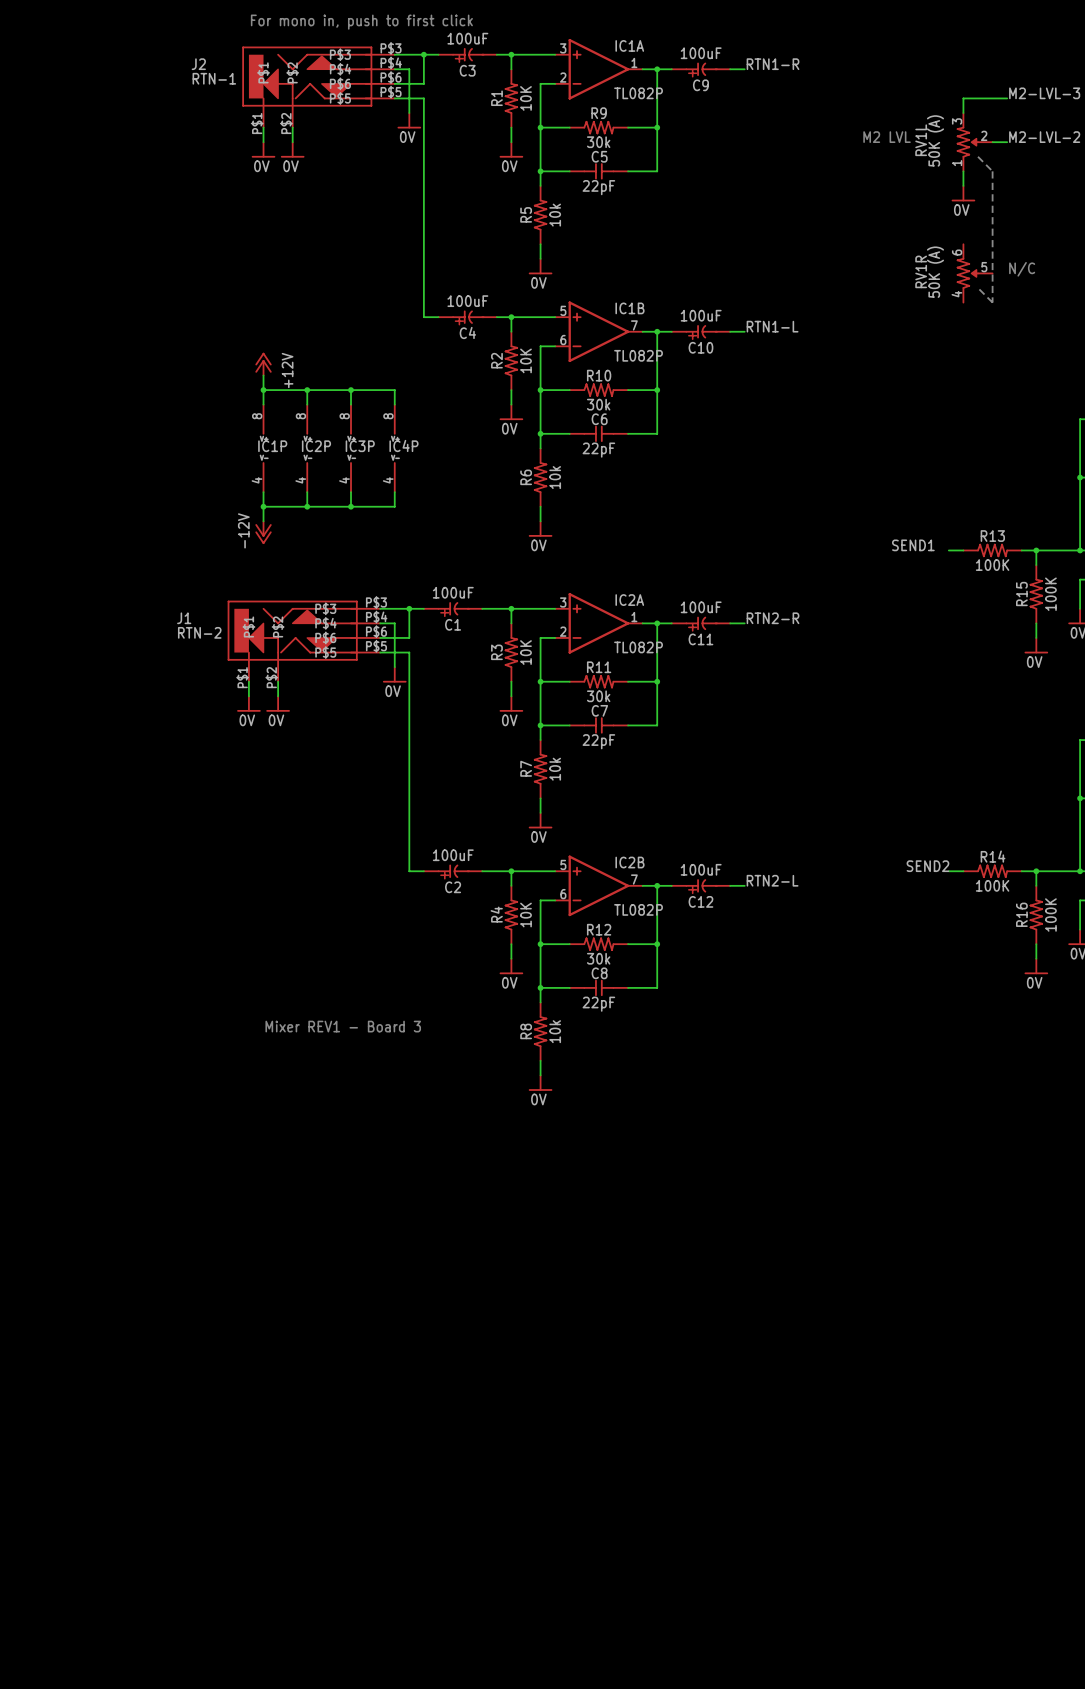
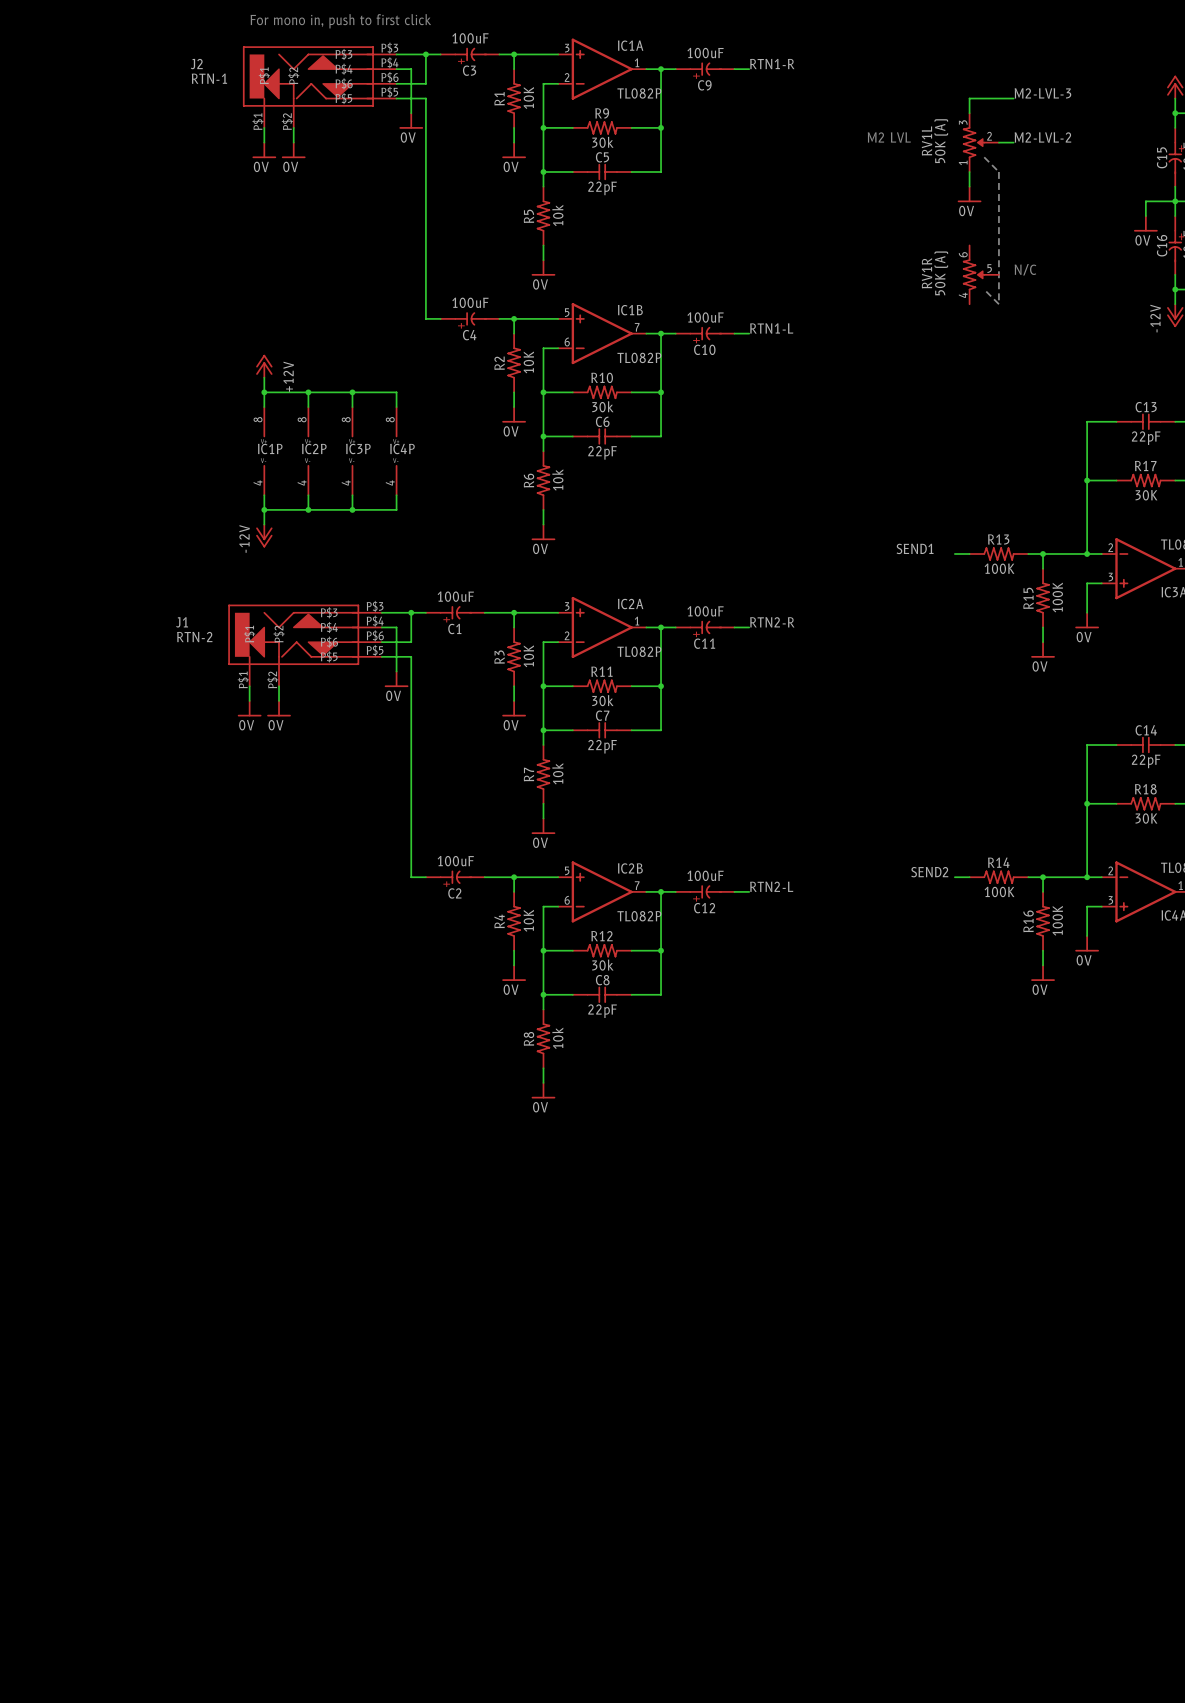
text: Mixer REV1 - Board 3 (343, 1026) -> none

